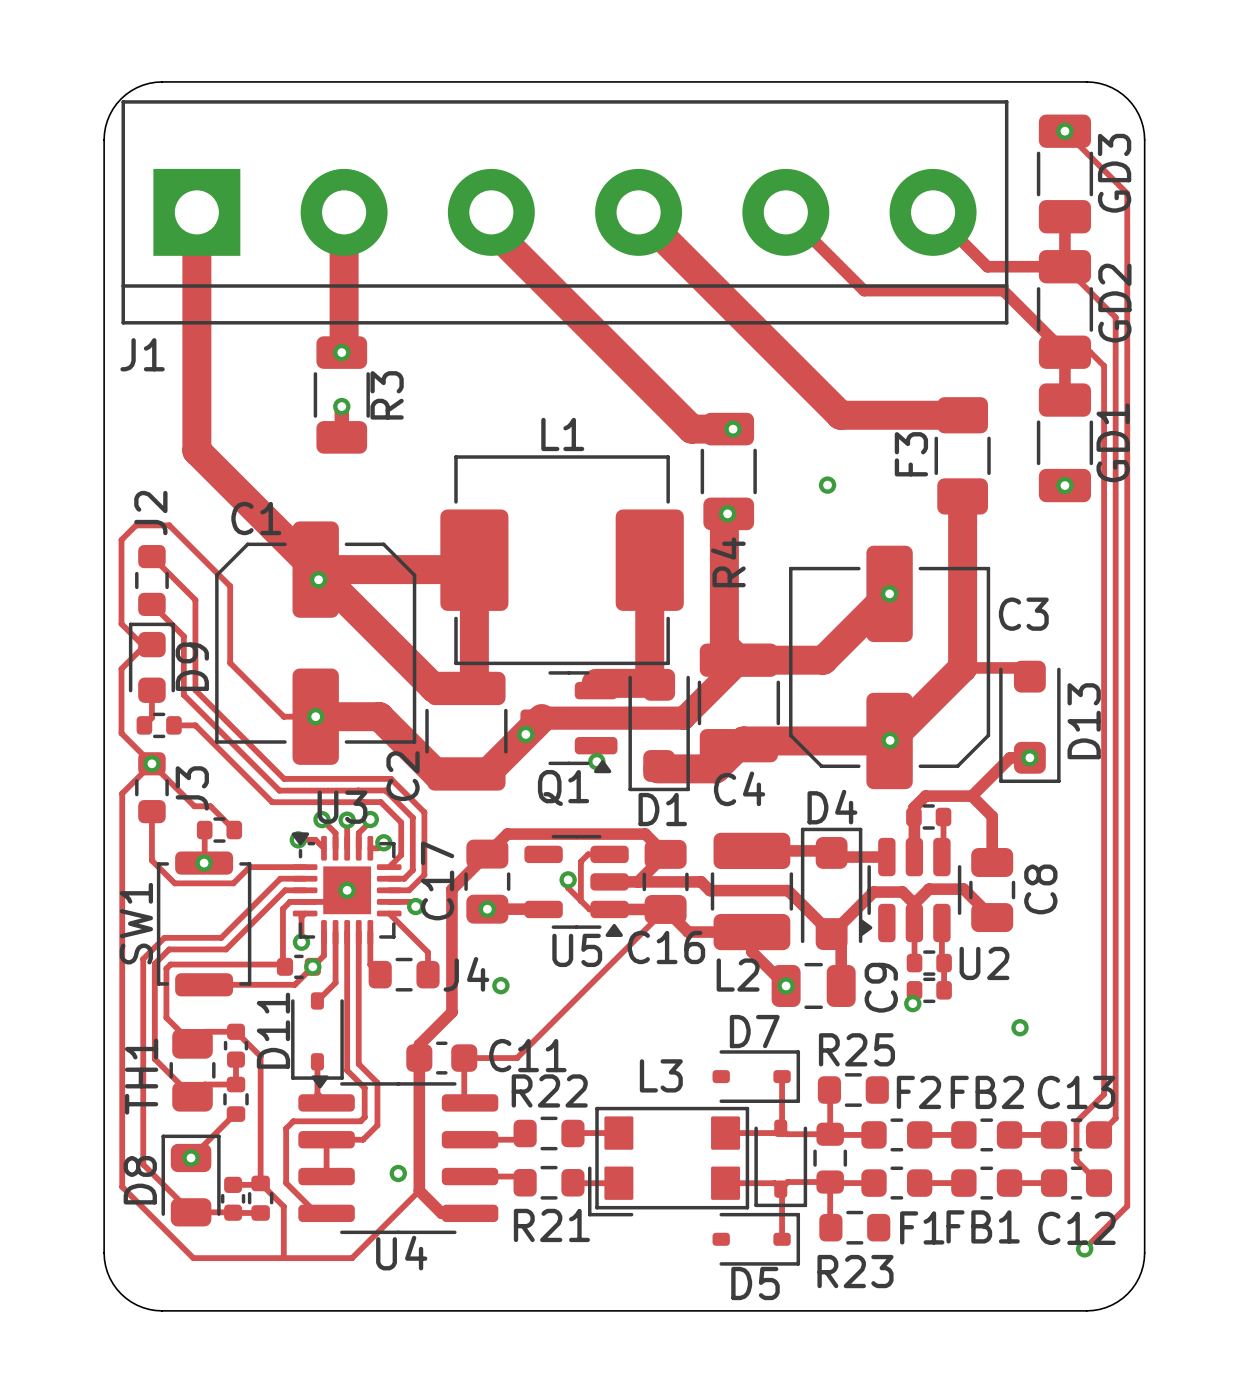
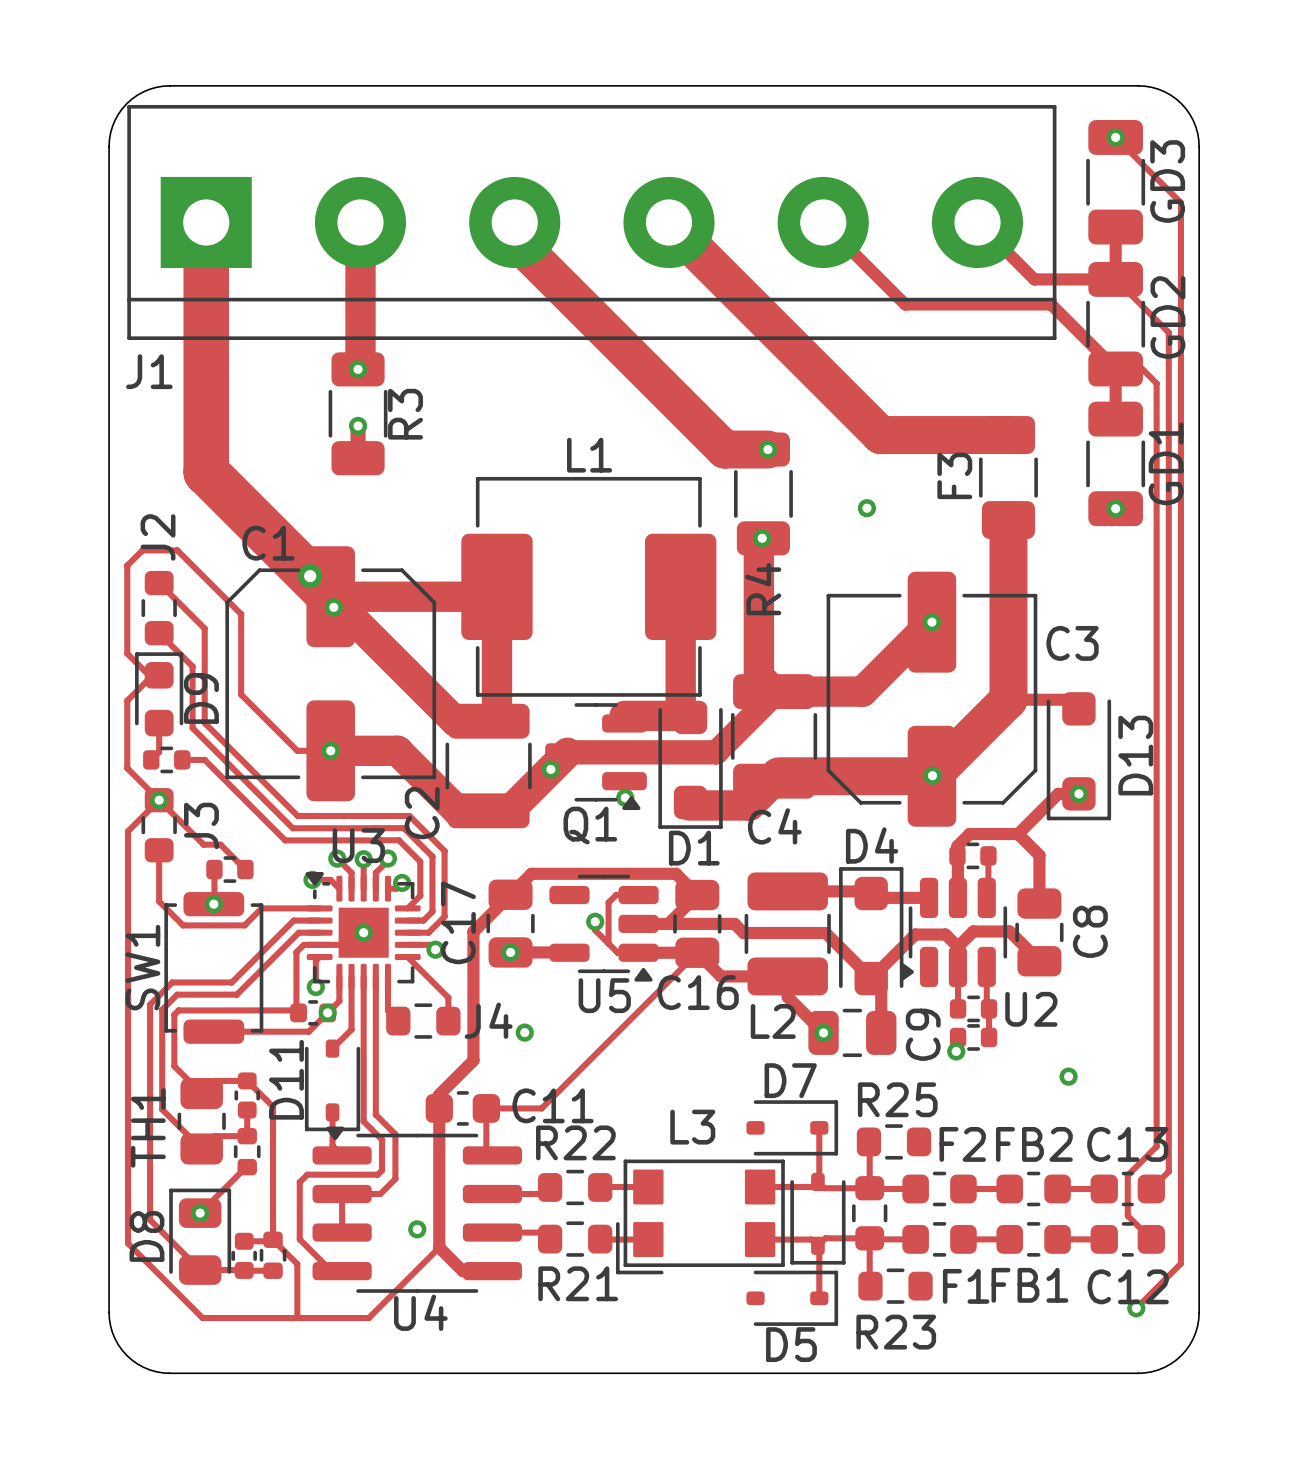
track width: thin (196, 212) (196, 450) (315, 569) -> thick (206, 222) (206, 472) (330, 596)
track width: thin (491, 212) (491, 228) (691, 429) (733, 429) -> thick (514, 222) (514, 239) (724, 449) (767, 449)
track width: thin (638, 213) (840, 415) (962, 415) -> thick (668, 223) (880, 435) (1008, 435)
track width: thin (962, 496) (962, 667) (890, 740) -> thick (1008, 520) (1008, 699) (932, 775)
via: none -> (310, 576)
track width: thin (743, 740) (889, 740) -> thick (778, 776) (931, 776)

